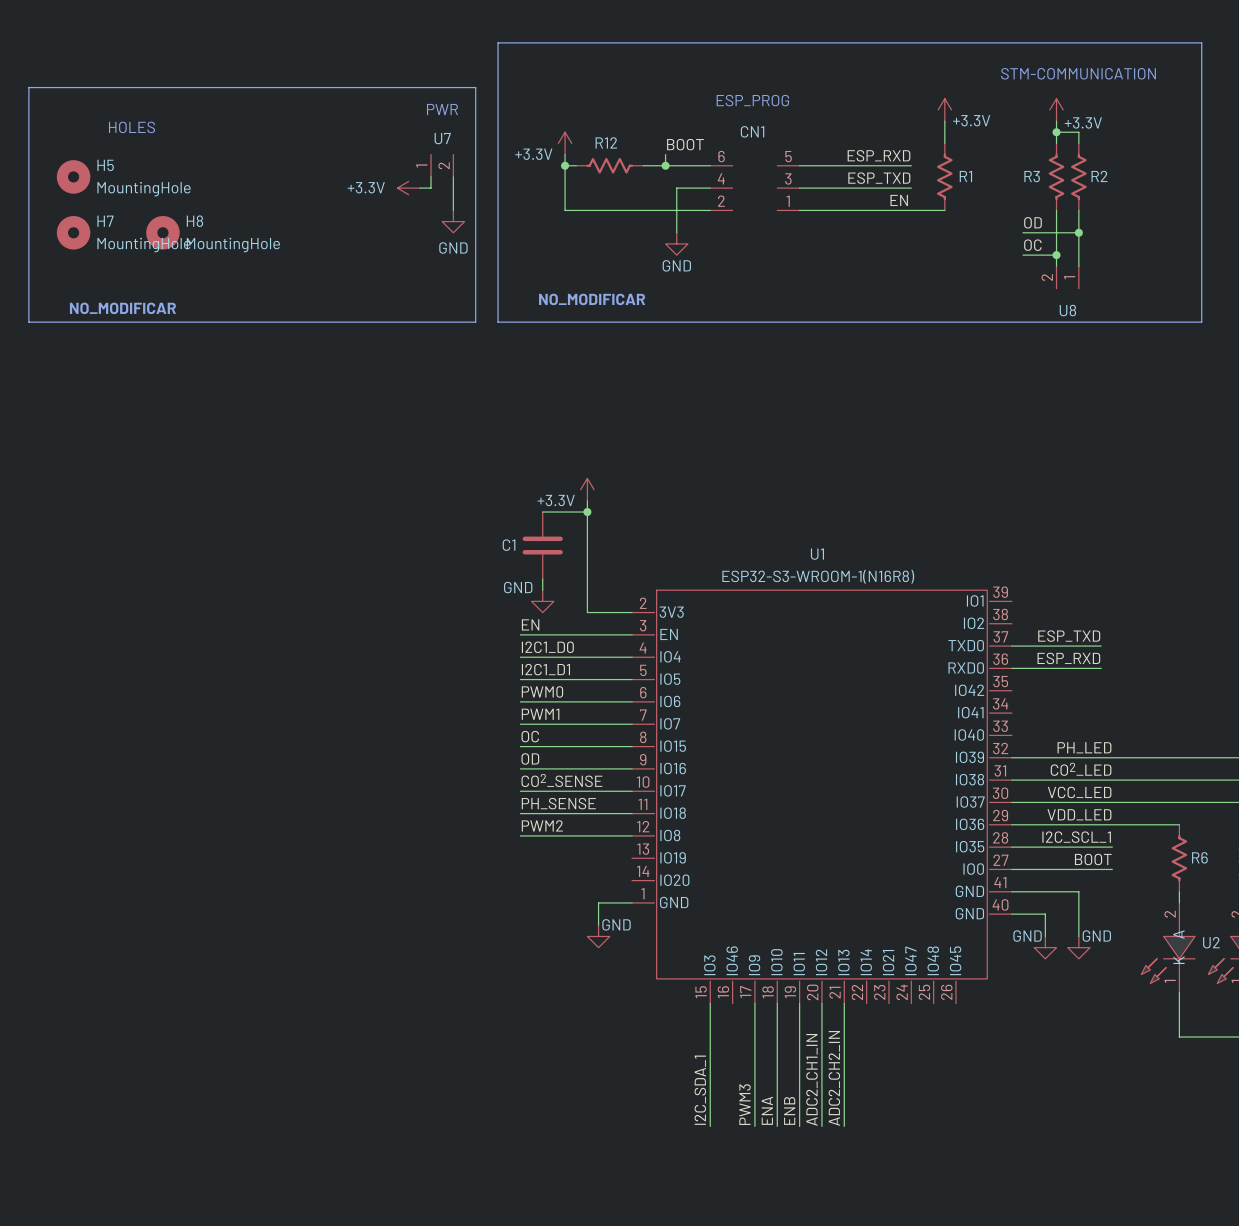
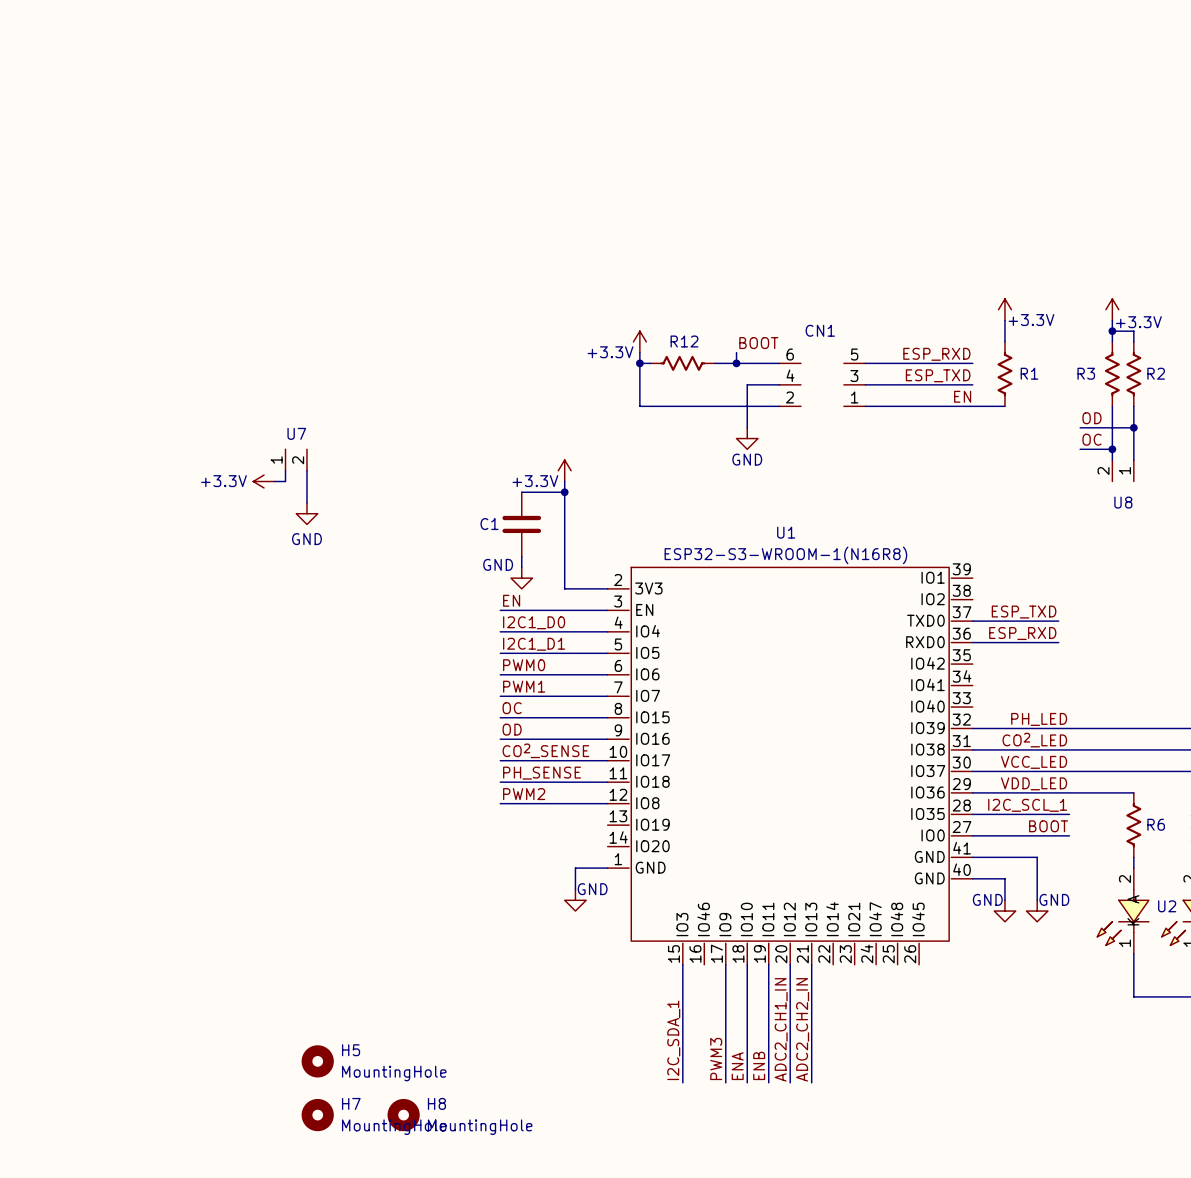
line: (498, 42) (1201, 42) (1201, 322) (498, 322) (498, 42) -> none
text: STM-COMMUNICATION (1078, 73) -> none
line: (28, 87) (475, 87) (475, 322) (28, 322) (28, 87) -> none
text: ESP_PROG (752, 100) -> none
text: PWR (442, 109) -> none
power symbol: +3.3V (944, 109) -> none
power symbol: +3.3V (1056, 109) -> none
wire: (944, 121) (944, 143) -> none
wire: (1056, 121) (1056, 143) -> (1004, 320) (1004, 341)
text: HOLES (131, 127) -> none
wire: (1056, 132) (1078, 132) (1078, 143) -> none
junction: (1056, 132) -> none
power symbol: +3.3V (565, 143) -> none
label: BOOT (685, 144) -> none
wire: (565, 154) (565, 210) (710, 210) -> none
wire: (665, 154) (665, 165) -> none
label: ESP_RXD (878, 155) -> none
U7 position: (442, 165) -> (296, 460)
wire: (565, 165) (576, 165) -> none
junction: (565, 165) -> none
R12 position: (609, 165) -> (682, 363)
wire: (643, 165) (710, 165) -> none
junction: (665, 165) -> none
wire: (799, 165) (911, 165) -> none
H5 position: (73, 176) -> (317, 1061)
wire: (431, 176) (431, 188) (419, 188) -> none
wire: (453, 176) (453, 210) -> none
R1 position: (944, 176) -> (1004, 374)
R3 position: (1056, 176) -> (1112, 374)
R2 position: (1078, 176) -> (1133, 374)
label: ESP_TXD (879, 178) -> none
power symbol: +3.3V (408, 188) -> none
wire: (710, 188) (676, 188) (676, 232) -> none
CN1 position: (754, 188) -> (822, 384)
wire: (799, 188) (911, 188) -> (865, 363) (972, 363)
label: EN (899, 200) -> none
wire: (799, 210) (944, 210) -> none
wire: (1056, 210) (1056, 266) -> none
wire: (1078, 210) (1078, 266) -> none
power symbol: GND (453, 221) -> none
label: OD (1032, 222) -> none
H7 position: (73, 232) -> (317, 1115)
H8 position: (162, 232) -> (403, 1115)
wire: (1023, 232) (1078, 232) -> none
junction: (1078, 232) -> none
power symbol: GND (676, 243) -> none
label: OC (1032, 245) -> none
wire: (1023, 255) (1056, 255) -> none
junction: (1056, 255) -> none
U8 position: (1067, 277) -> (1123, 470)
text: NO_MODIFICAR (592, 299) -> none
text: NO_MODIFICAR (122, 308) -> none
power symbol: none -> +3.3V (1004, 309)
power symbol: none -> +3.3V (1112, 309)
wire: none -> (1112, 320) (1112, 341)
wire: none -> (1112, 331) (1133, 331) (1133, 341)
junction: none -> (1112, 331)
power symbol: none -> +3.3V (639, 341)
label: none -> BOOT (758, 343)
wire: none -> (639, 352) (639, 406) (779, 406)
wire: none -> (736, 352) (736, 363)
label: none -> ESP_RXD (936, 354)
wire: none -> (639, 363) (650, 363)
junction: none -> (639, 363)
wire: none -> (715, 363) (779, 363)
junction: none -> (736, 363)
label: none -> ESP_TXD (938, 375)
wire: none -> (779, 384) (747, 384) (747, 427)
wire: none -> (865, 384) (972, 384)
label: none -> EN (962, 396)
wire: none -> (865, 406) (1004, 406)
wire: none -> (1112, 406) (1112, 460)
wire: none -> (1133, 406) (1133, 460)
label: none -> OD (1091, 418)
wire: none -> (1080, 427) (1133, 427)
junction: none -> (1133, 427)
power symbol: none -> GND (747, 438)
label: none -> OC (1091, 439)
wire: none -> (1080, 449) (1112, 449)
junction: none -> (1112, 449)
wire: none -> (285, 470) (285, 481) (274, 481)
wire: none -> (306, 470) (306, 502)
power symbol: none -> +3.3V (264, 481)
power symbol: none -> GND (306, 513)

